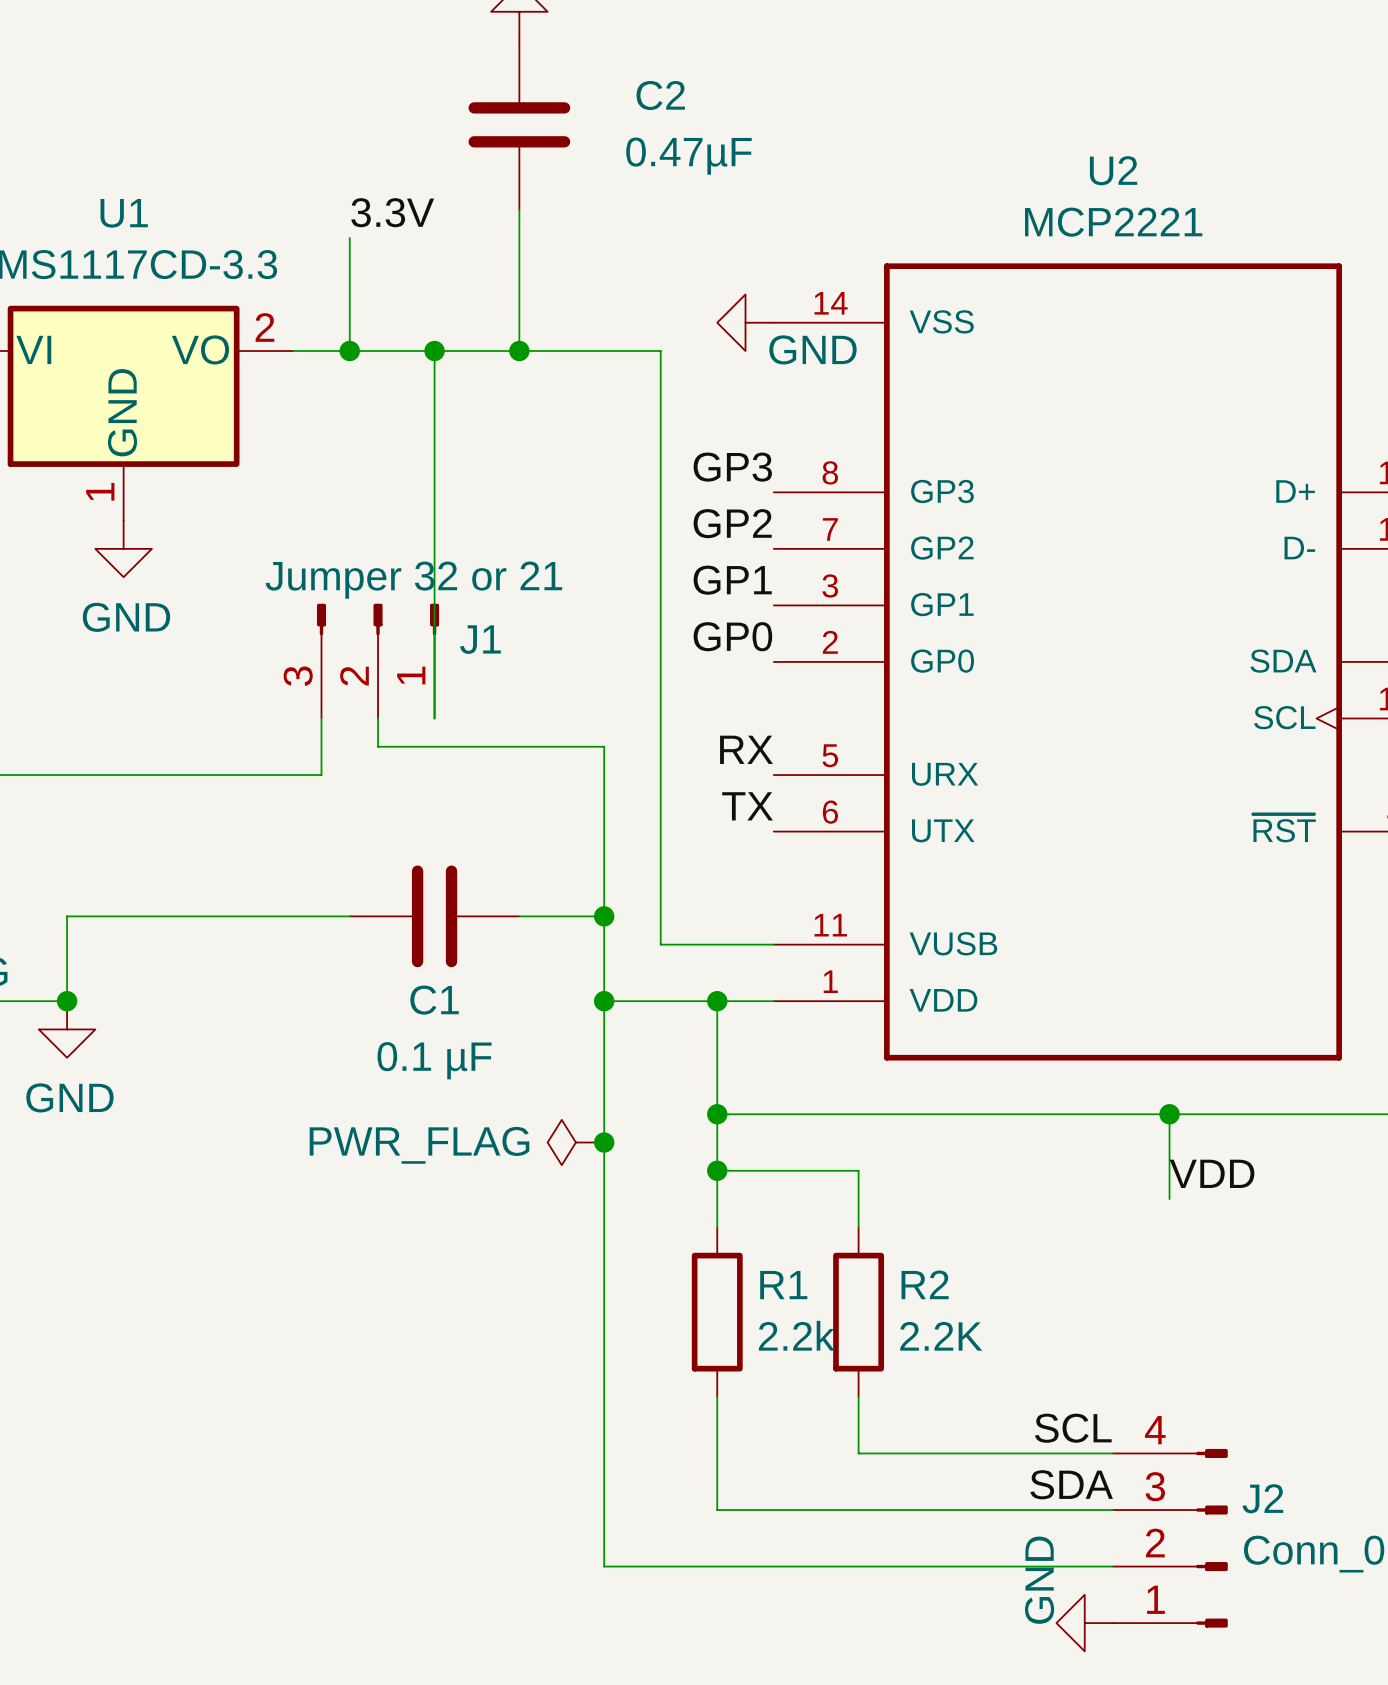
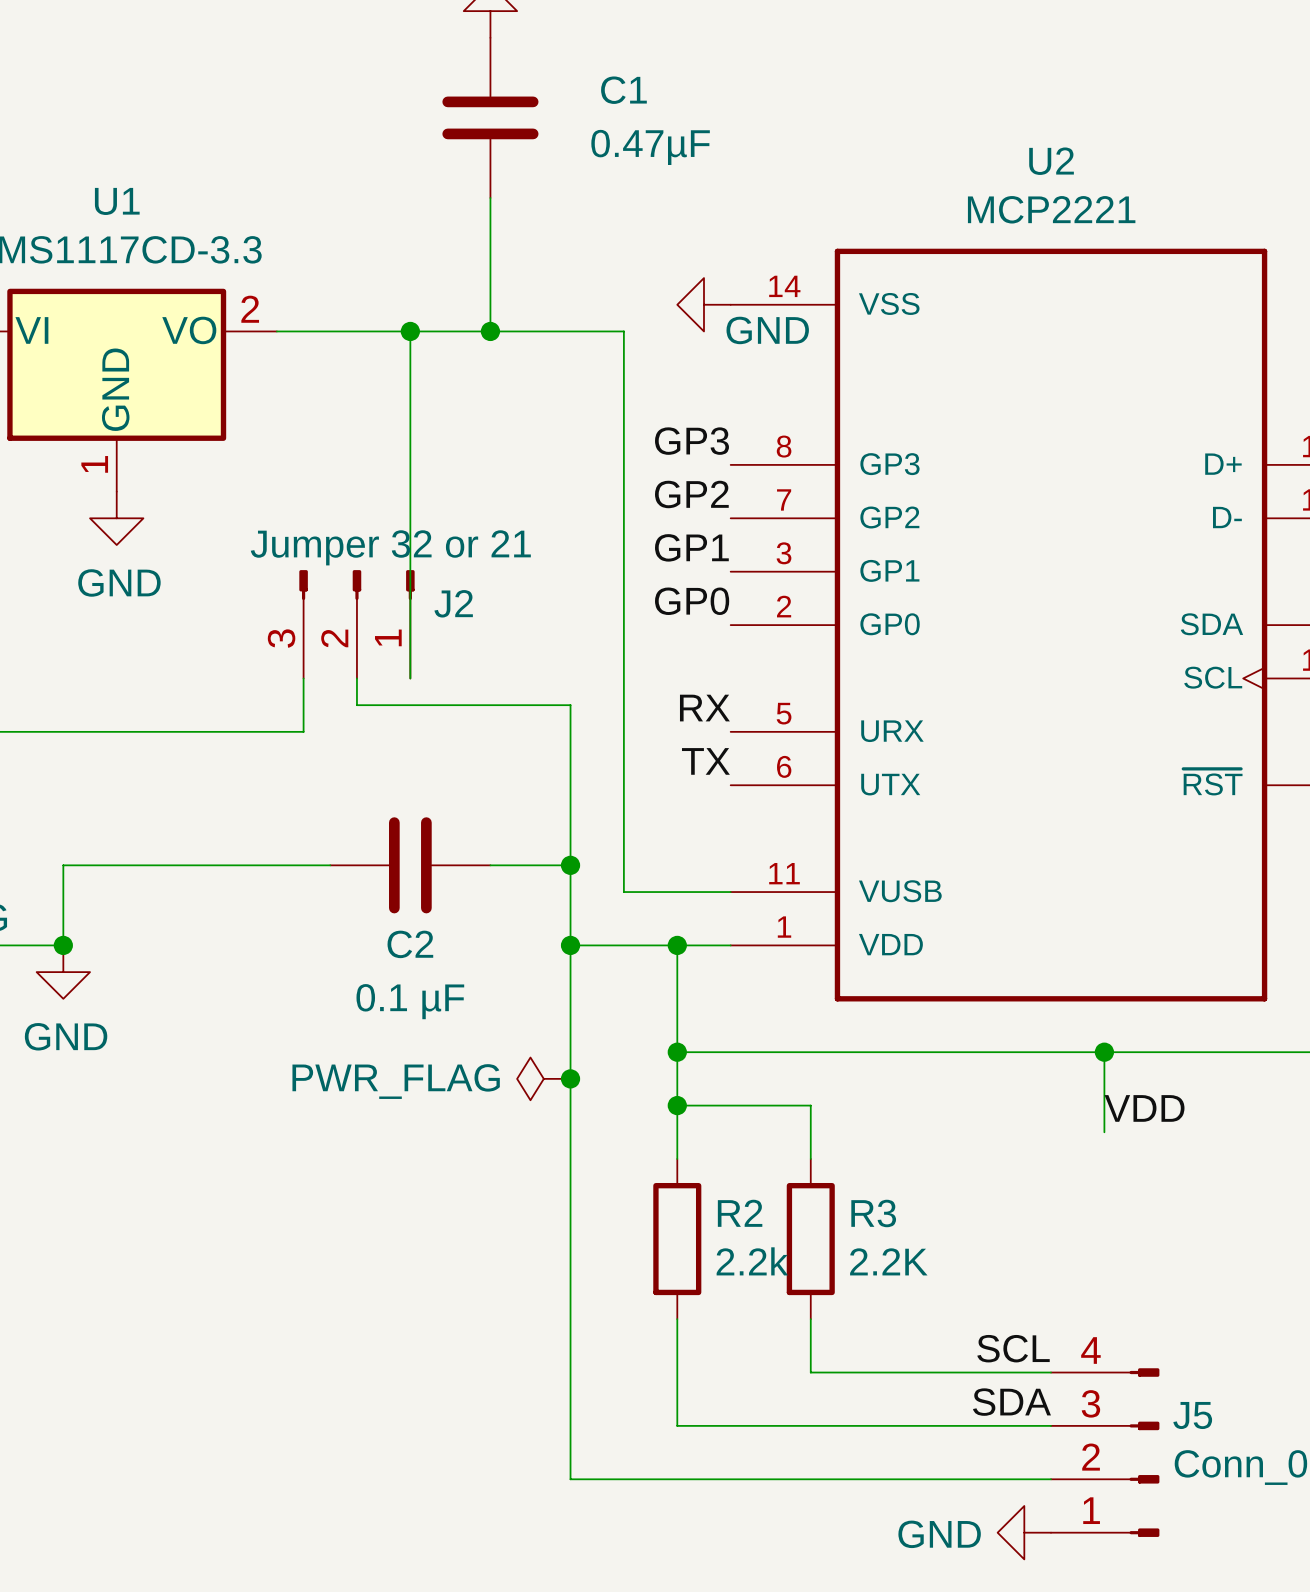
C2 name: C2 (660, 95) -> C1 (623, 90)
label: 3.3V (392, 212) -> none
wire: (349, 237) (349, 351) -> none
junction: (349, 351) -> none
J1 name: J1 (480, 639) -> J2 (453, 603)
C1 name: C1 (434, 1000) -> C2 (410, 944)
R2 name: R2 (925, 1284) -> R3 (873, 1213)
R1 name: R1 (783, 1285) -> R2 (740, 1213)
J2 name: J2 (1262, 1498) -> J5 (1192, 1415)
power symbol text rotation: 0° (1039, 1580) -> 90° clockwise (939, 1534)

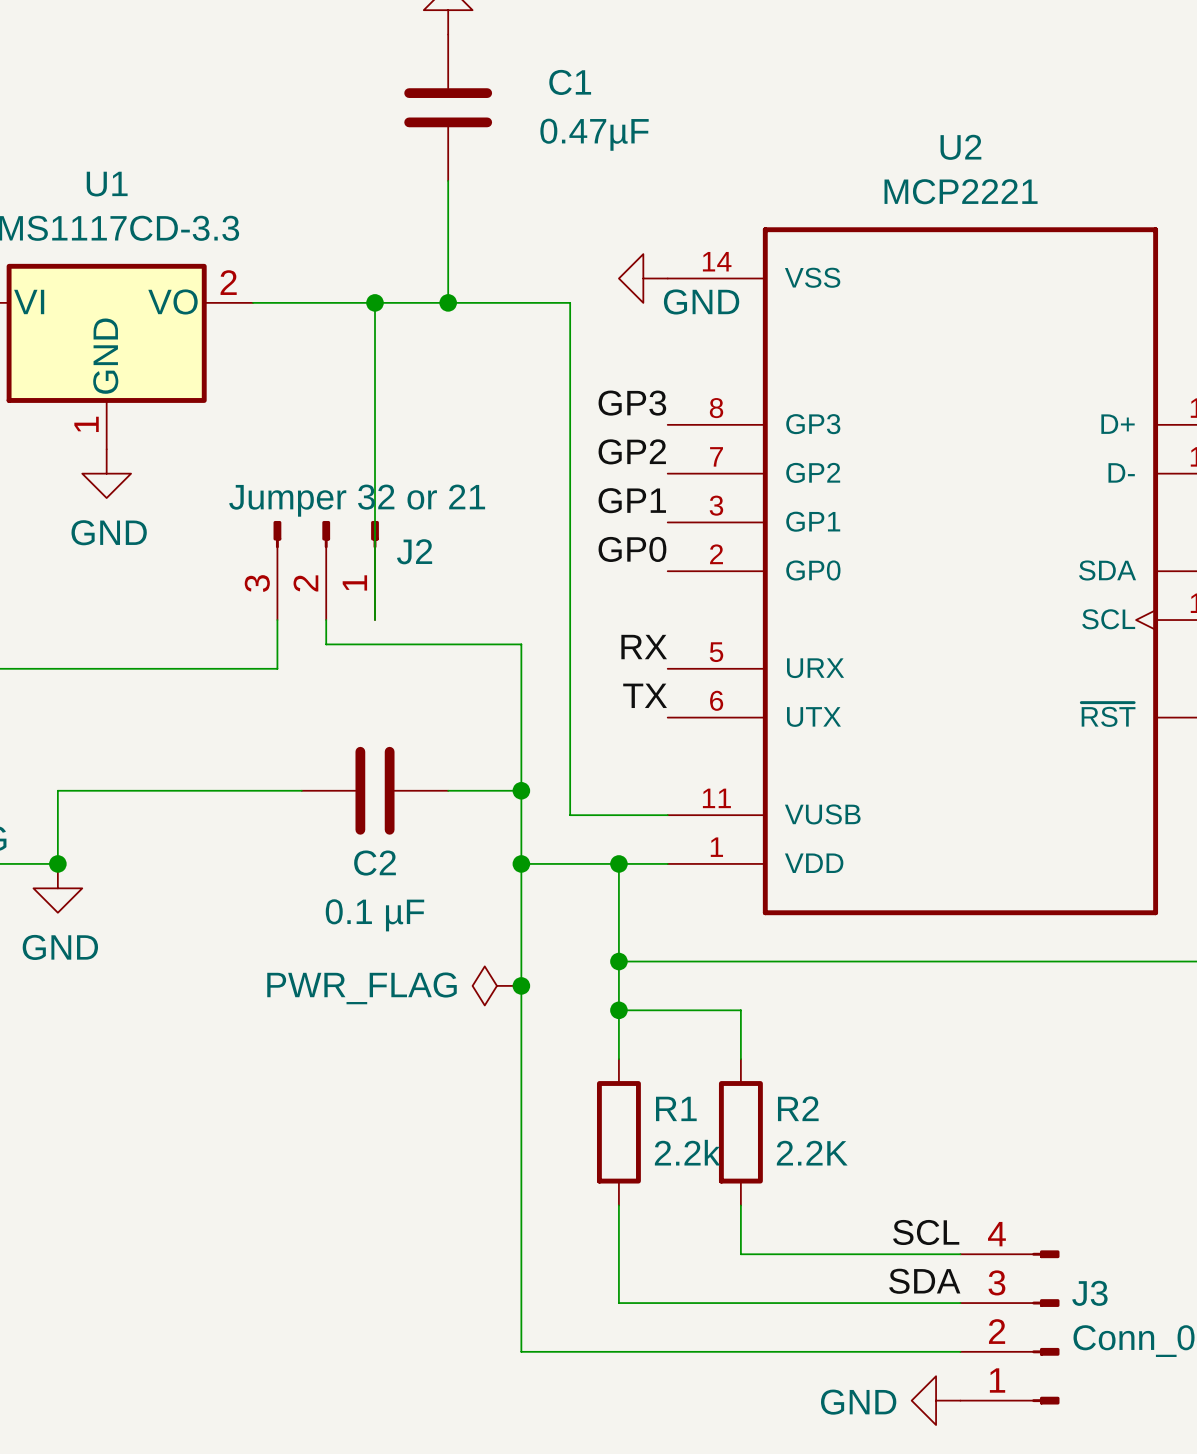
wire: (1104, 1052) (1104, 1132) -> none
junction: (1104, 1052) -> none
label: VDD (1144, 1108) -> none
R2 name: R2 (740, 1213) -> R1 (676, 1108)
R3 name: R3 (873, 1213) -> R2 (798, 1108)
J5 name: J5 (1192, 1415) -> J3 (1089, 1293)

